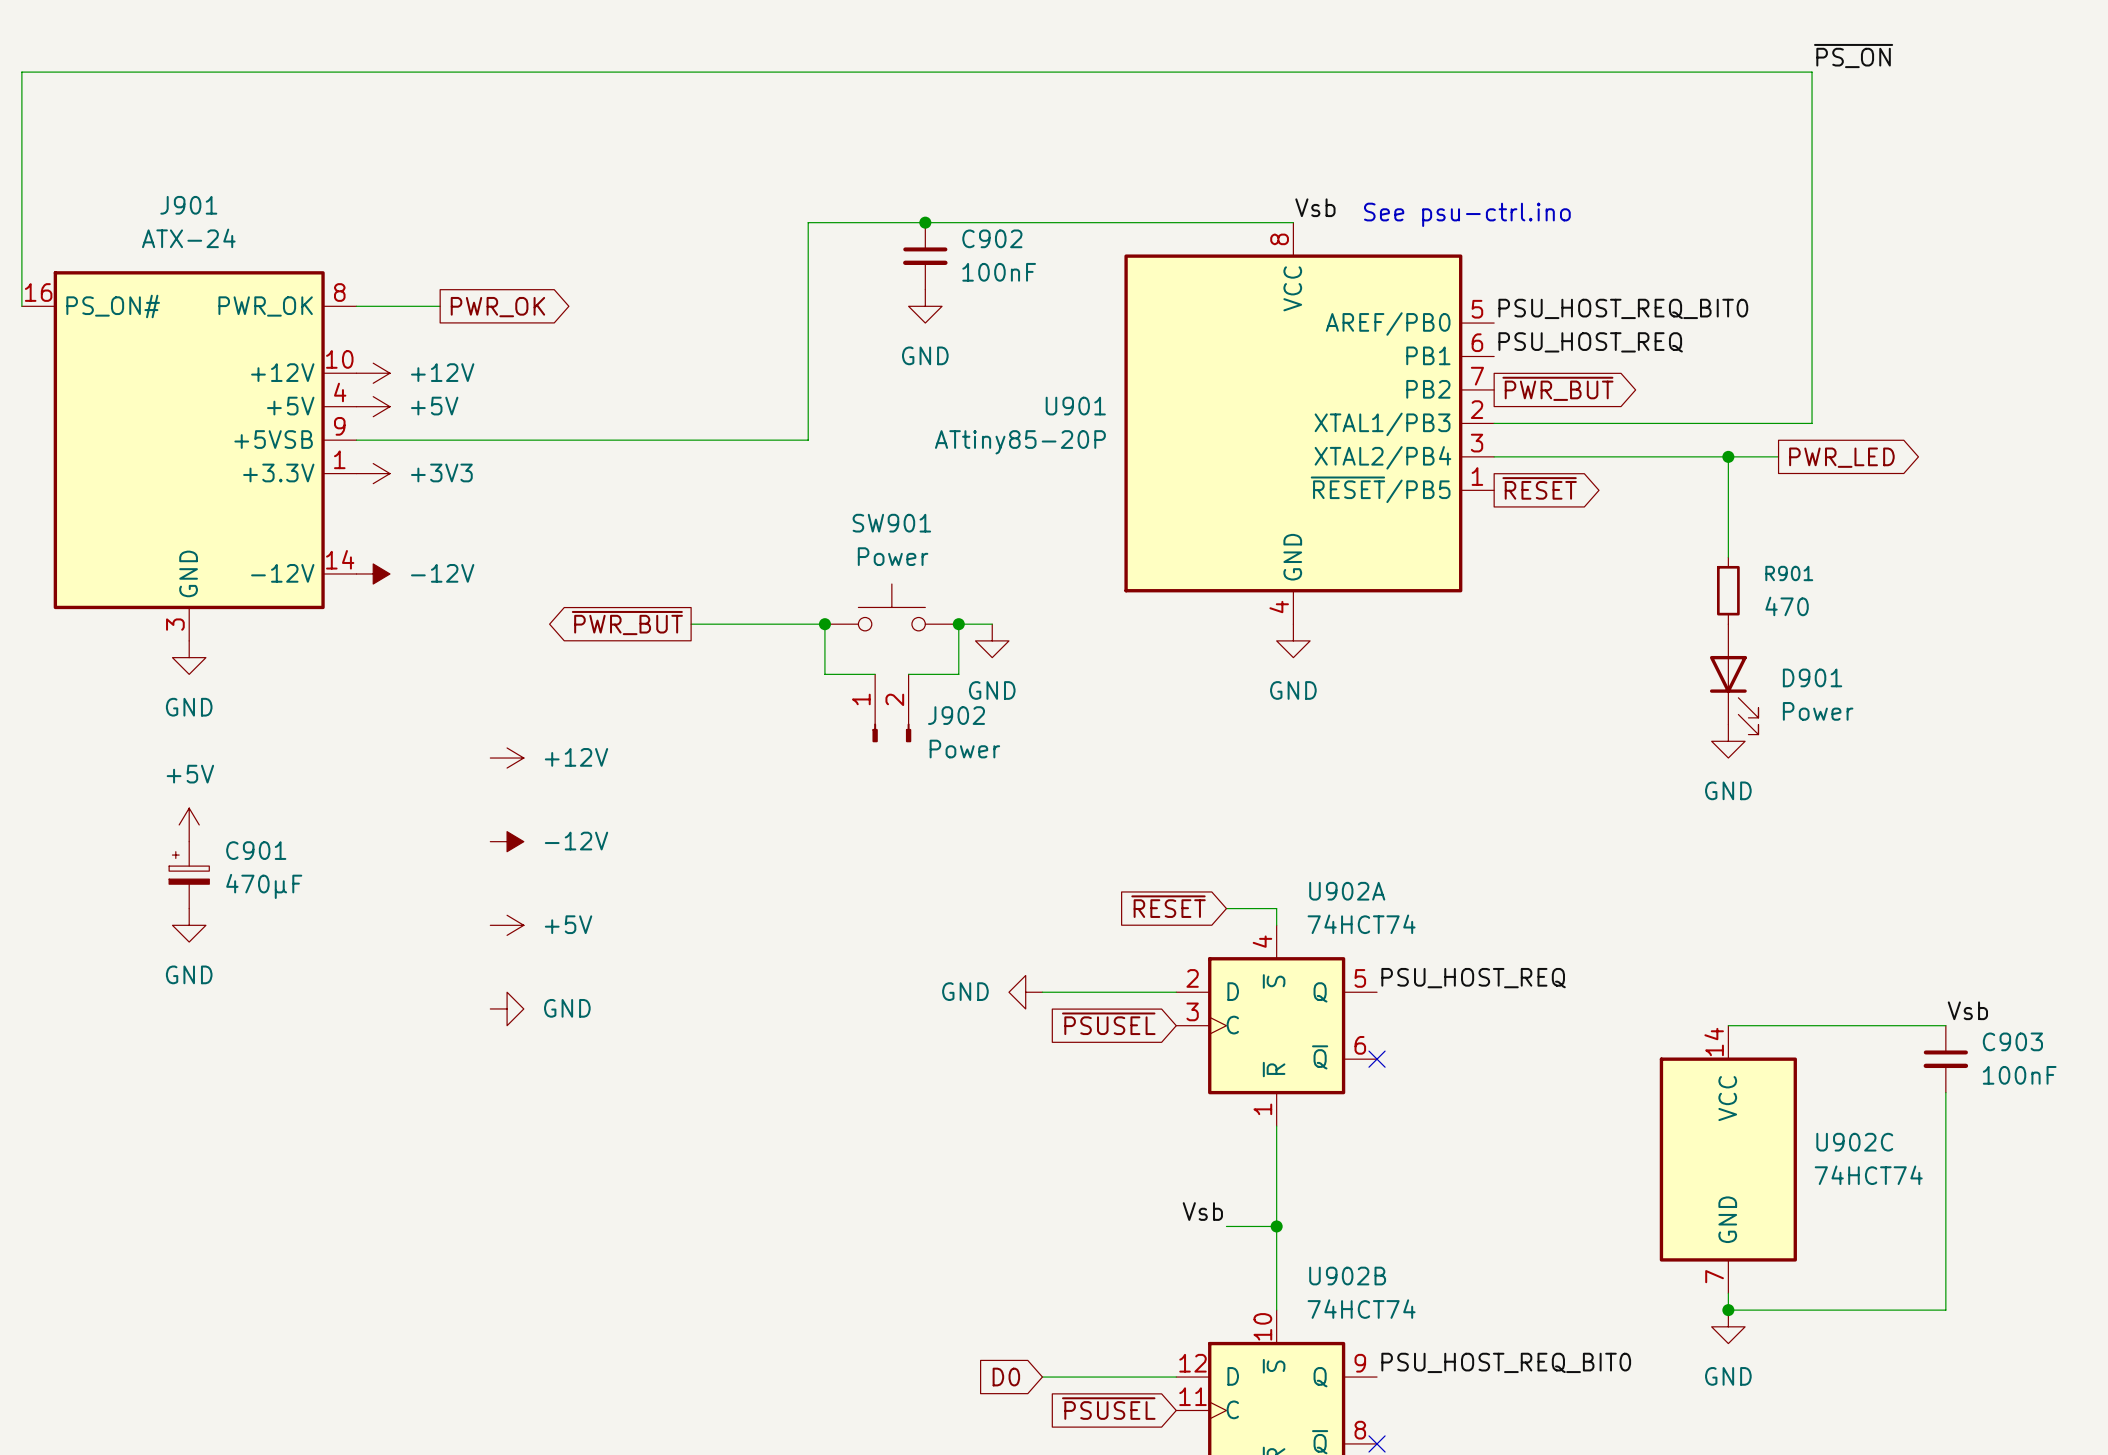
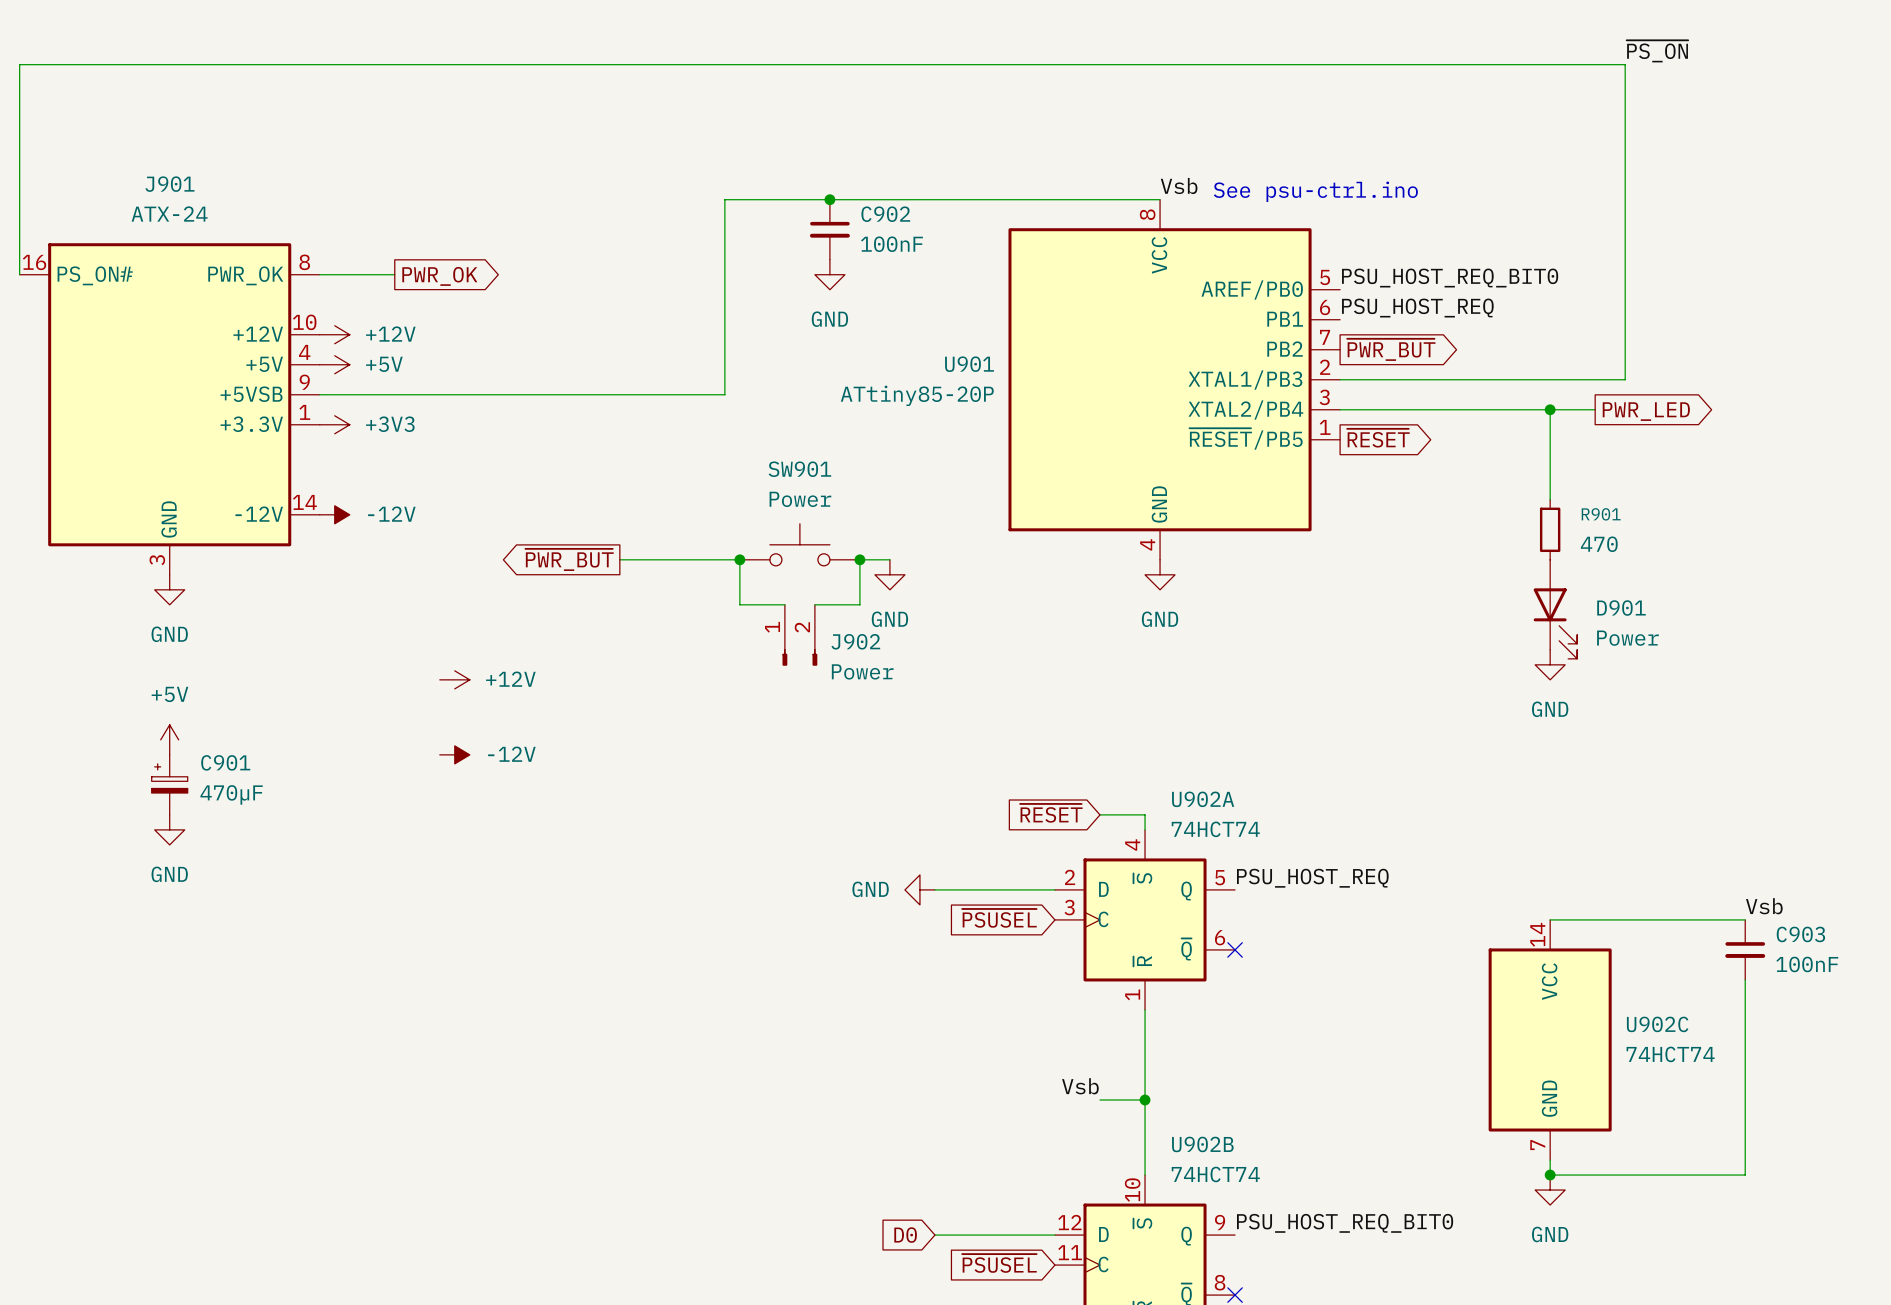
power symbol: +5V (507, 925) -> none
power symbol: GND (507, 1008) -> none

